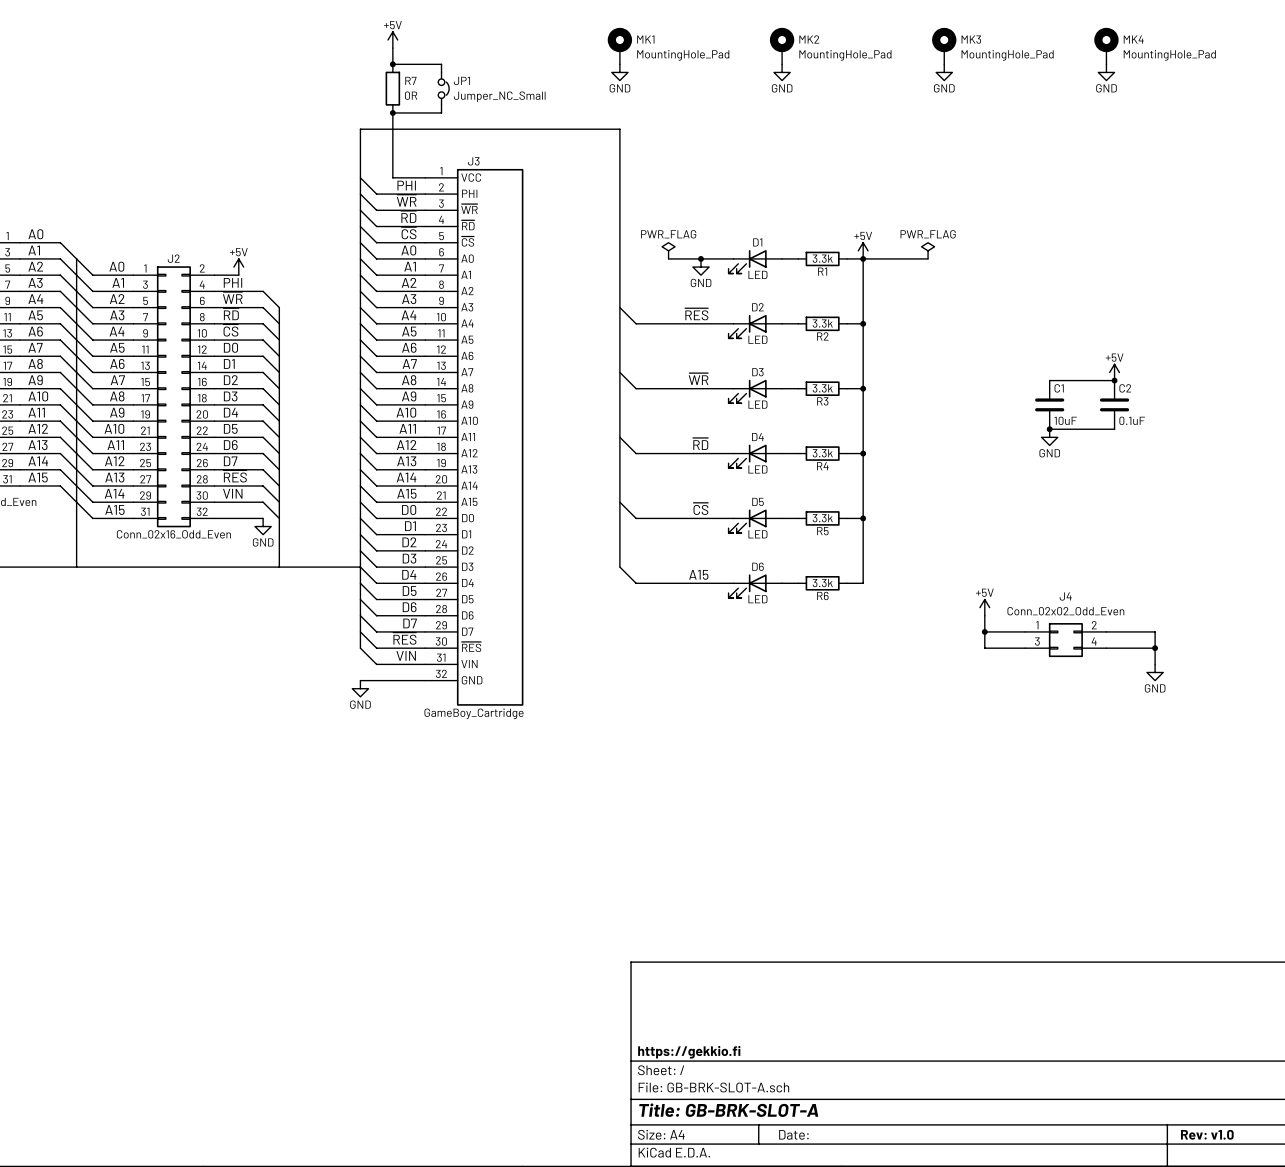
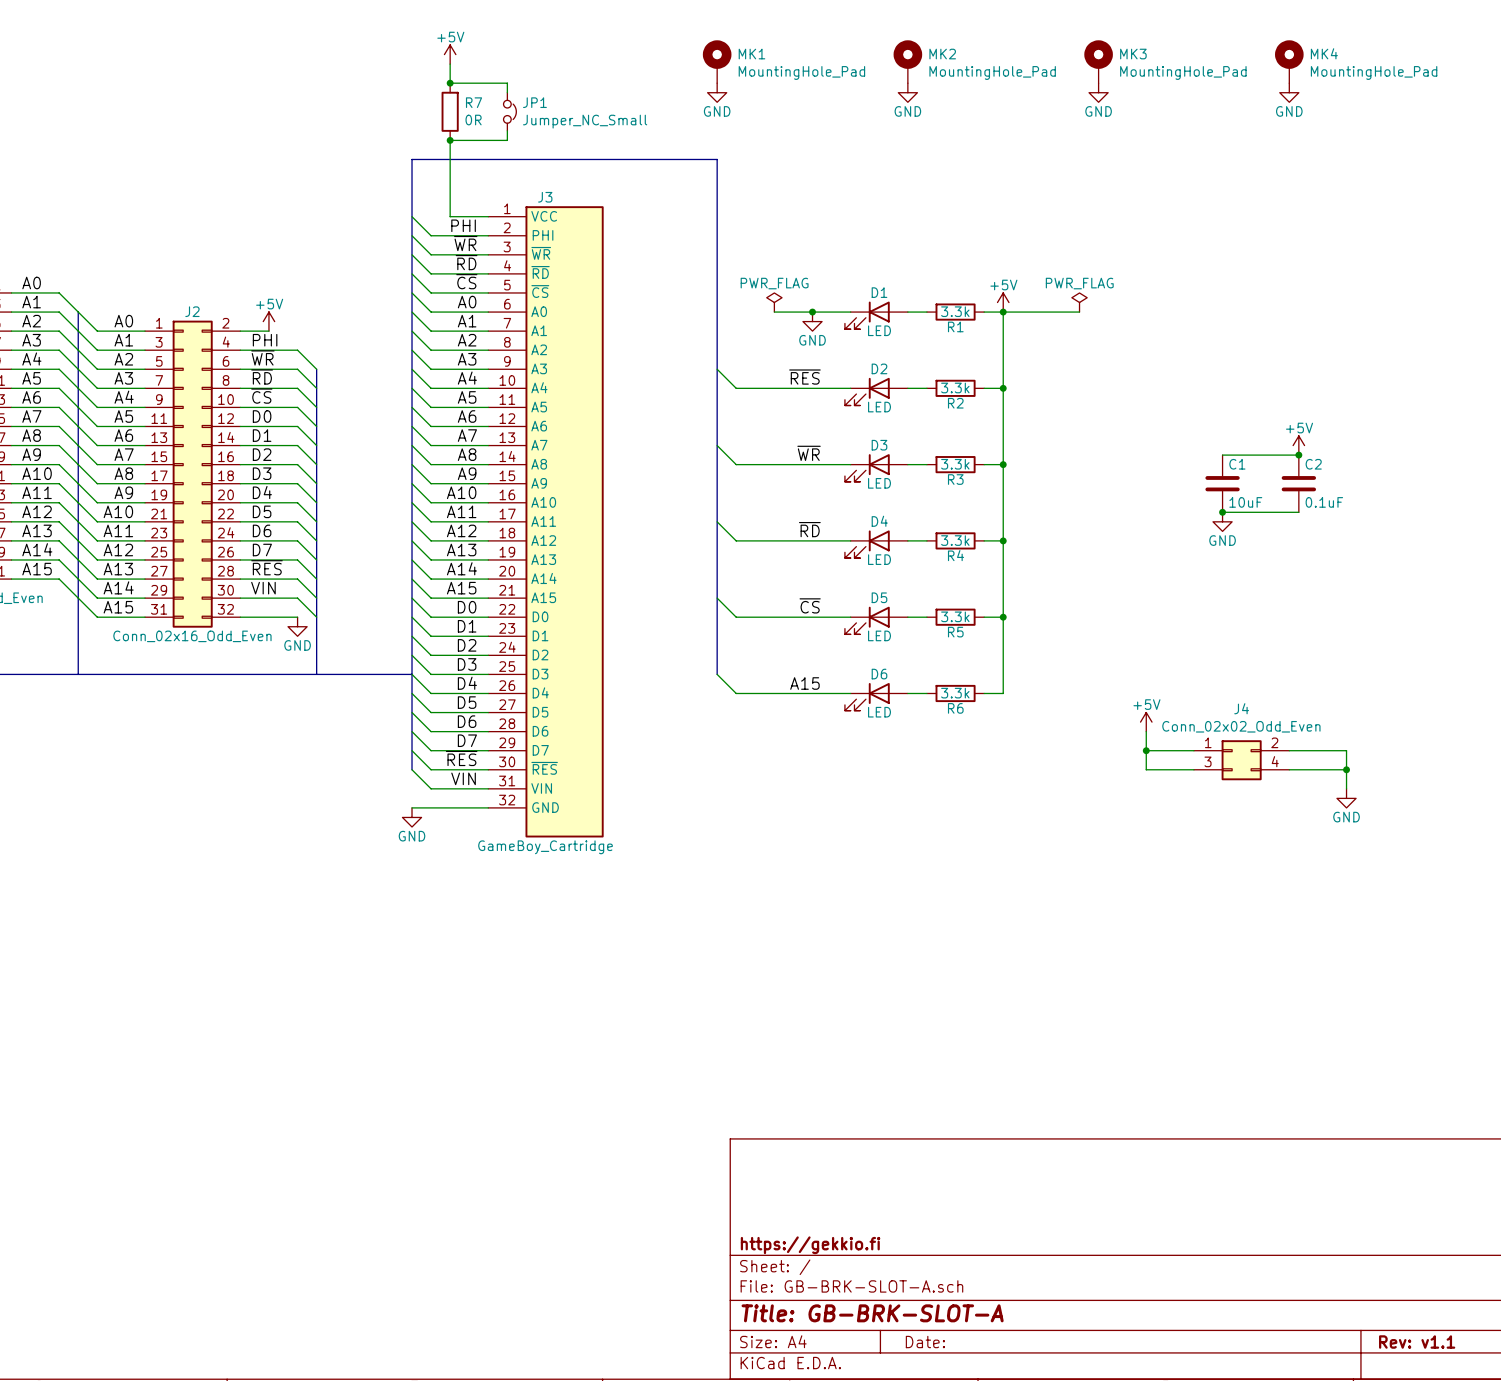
title block: Rev: v1.0 (1207, 1134) -> Rev: v1.1 (1417, 1342)

